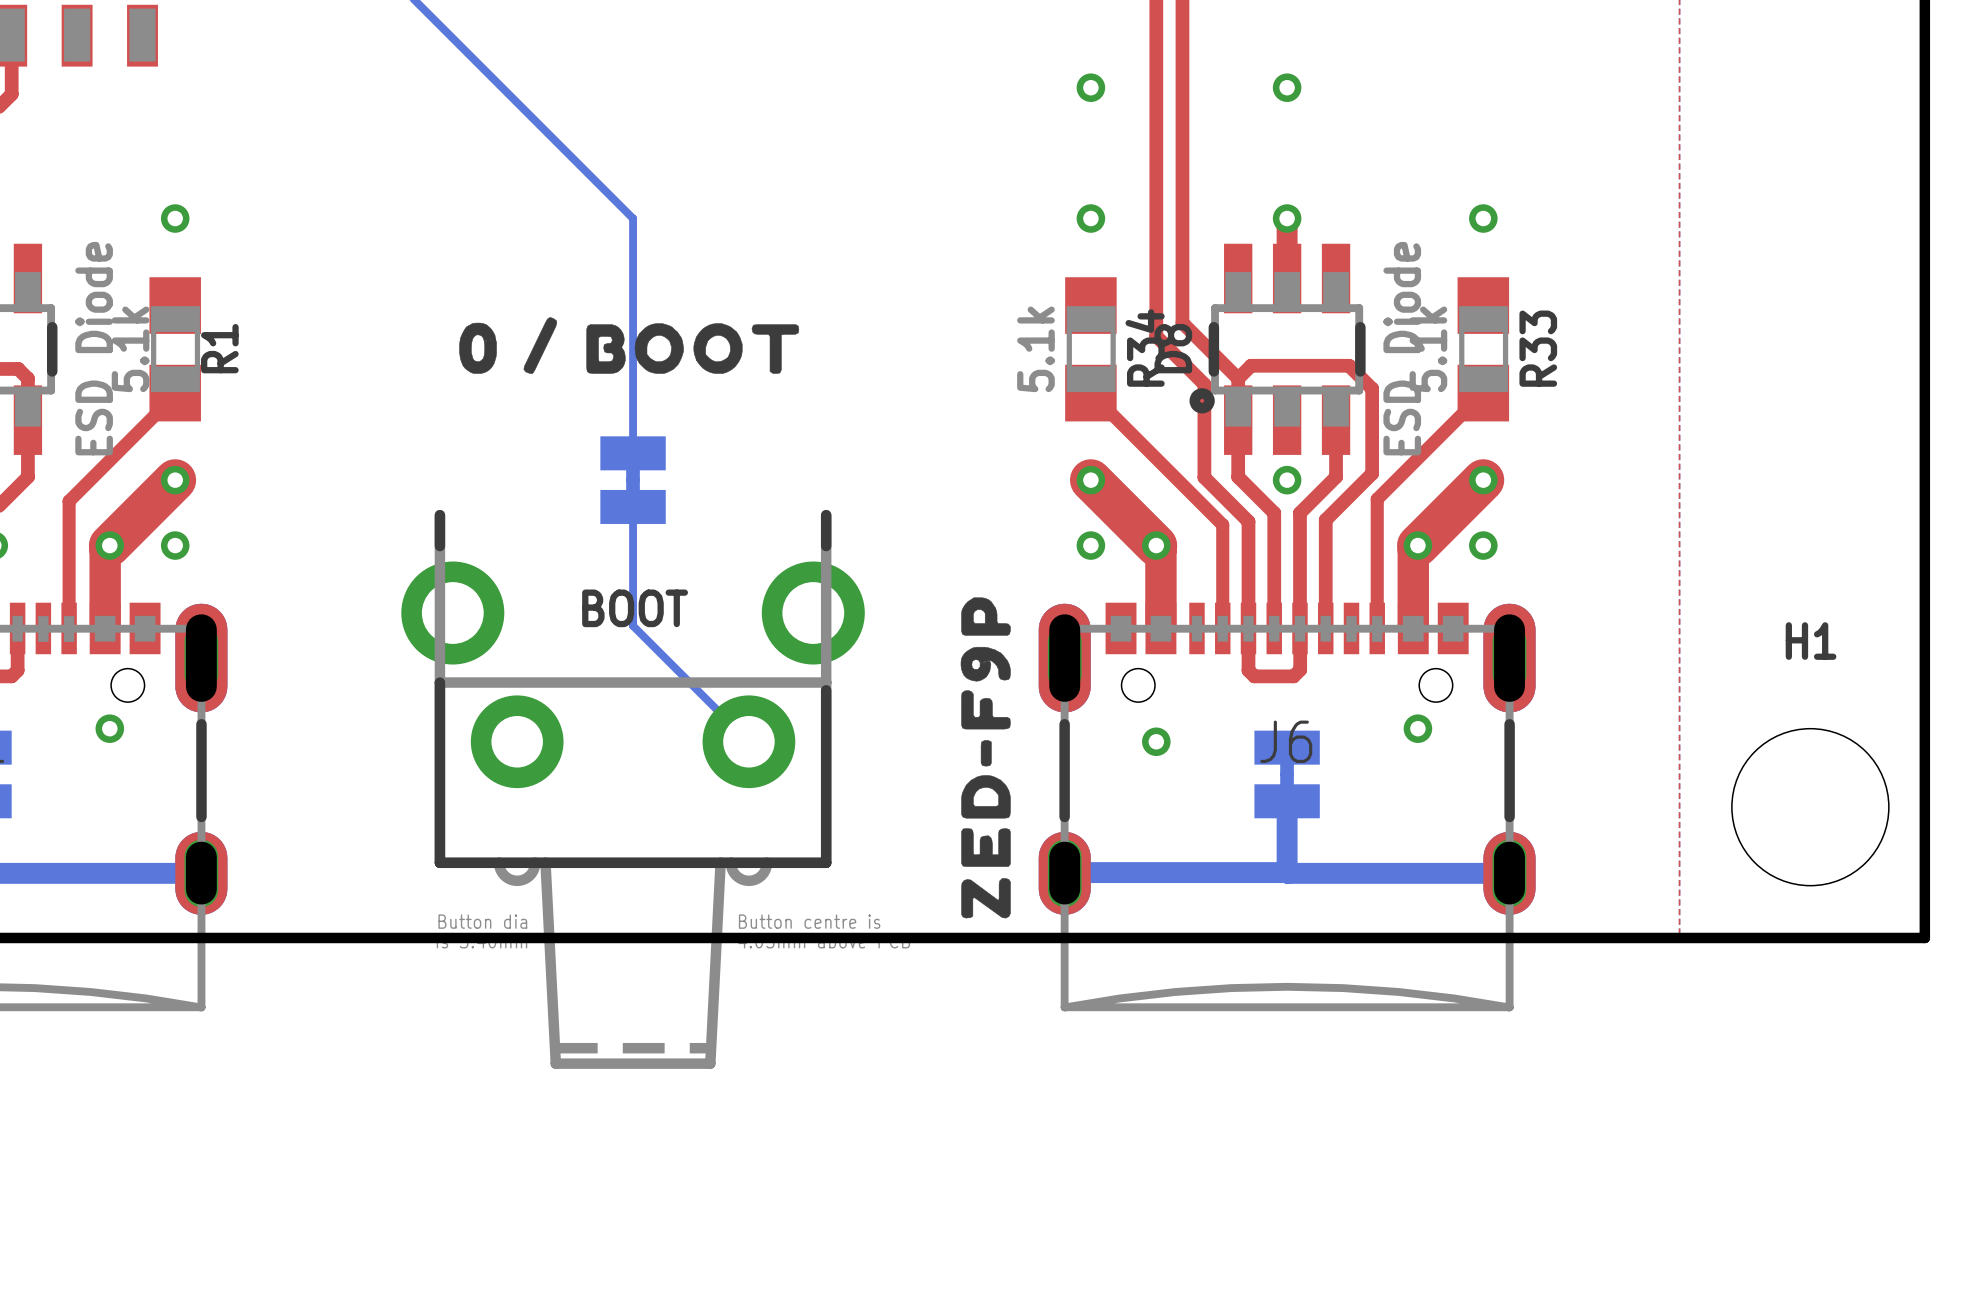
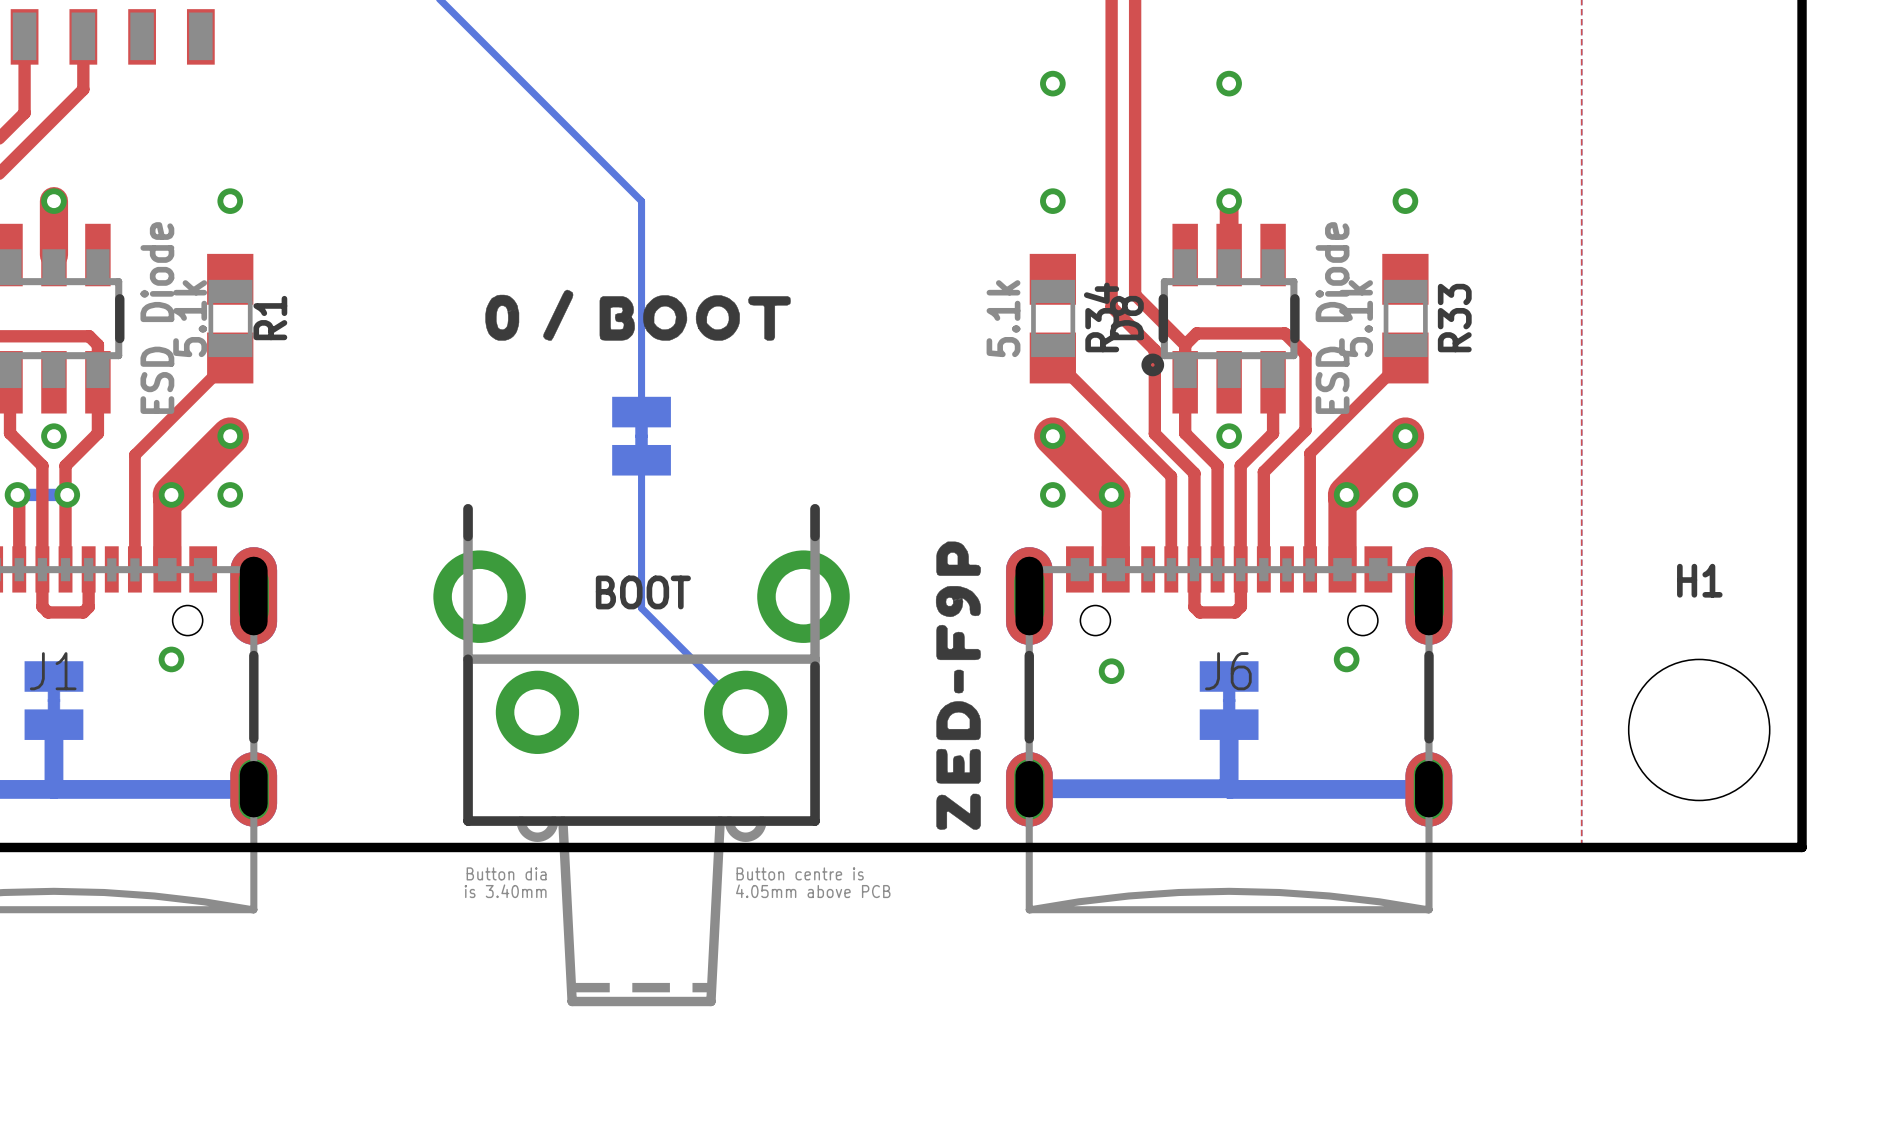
bottom track: (633, 625) (748, 741) -> (641, 567) (641, 608) (745, 712)
BOOT position: (633, 789) -> (641, 755)

